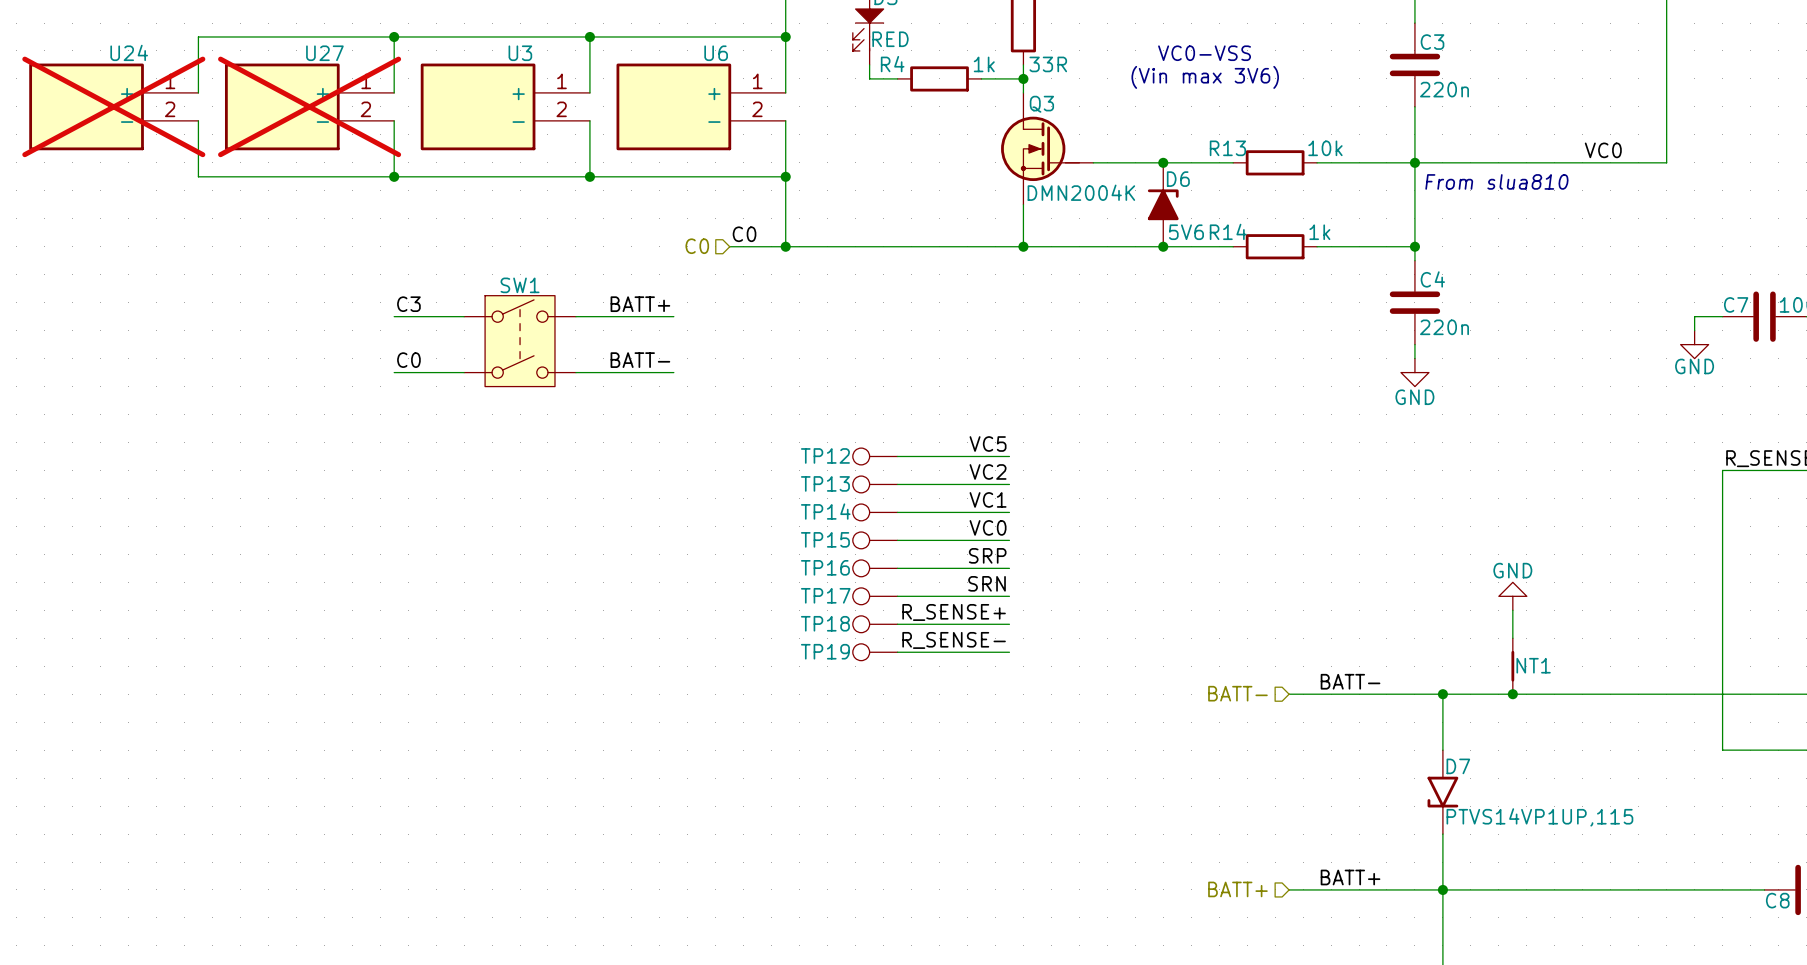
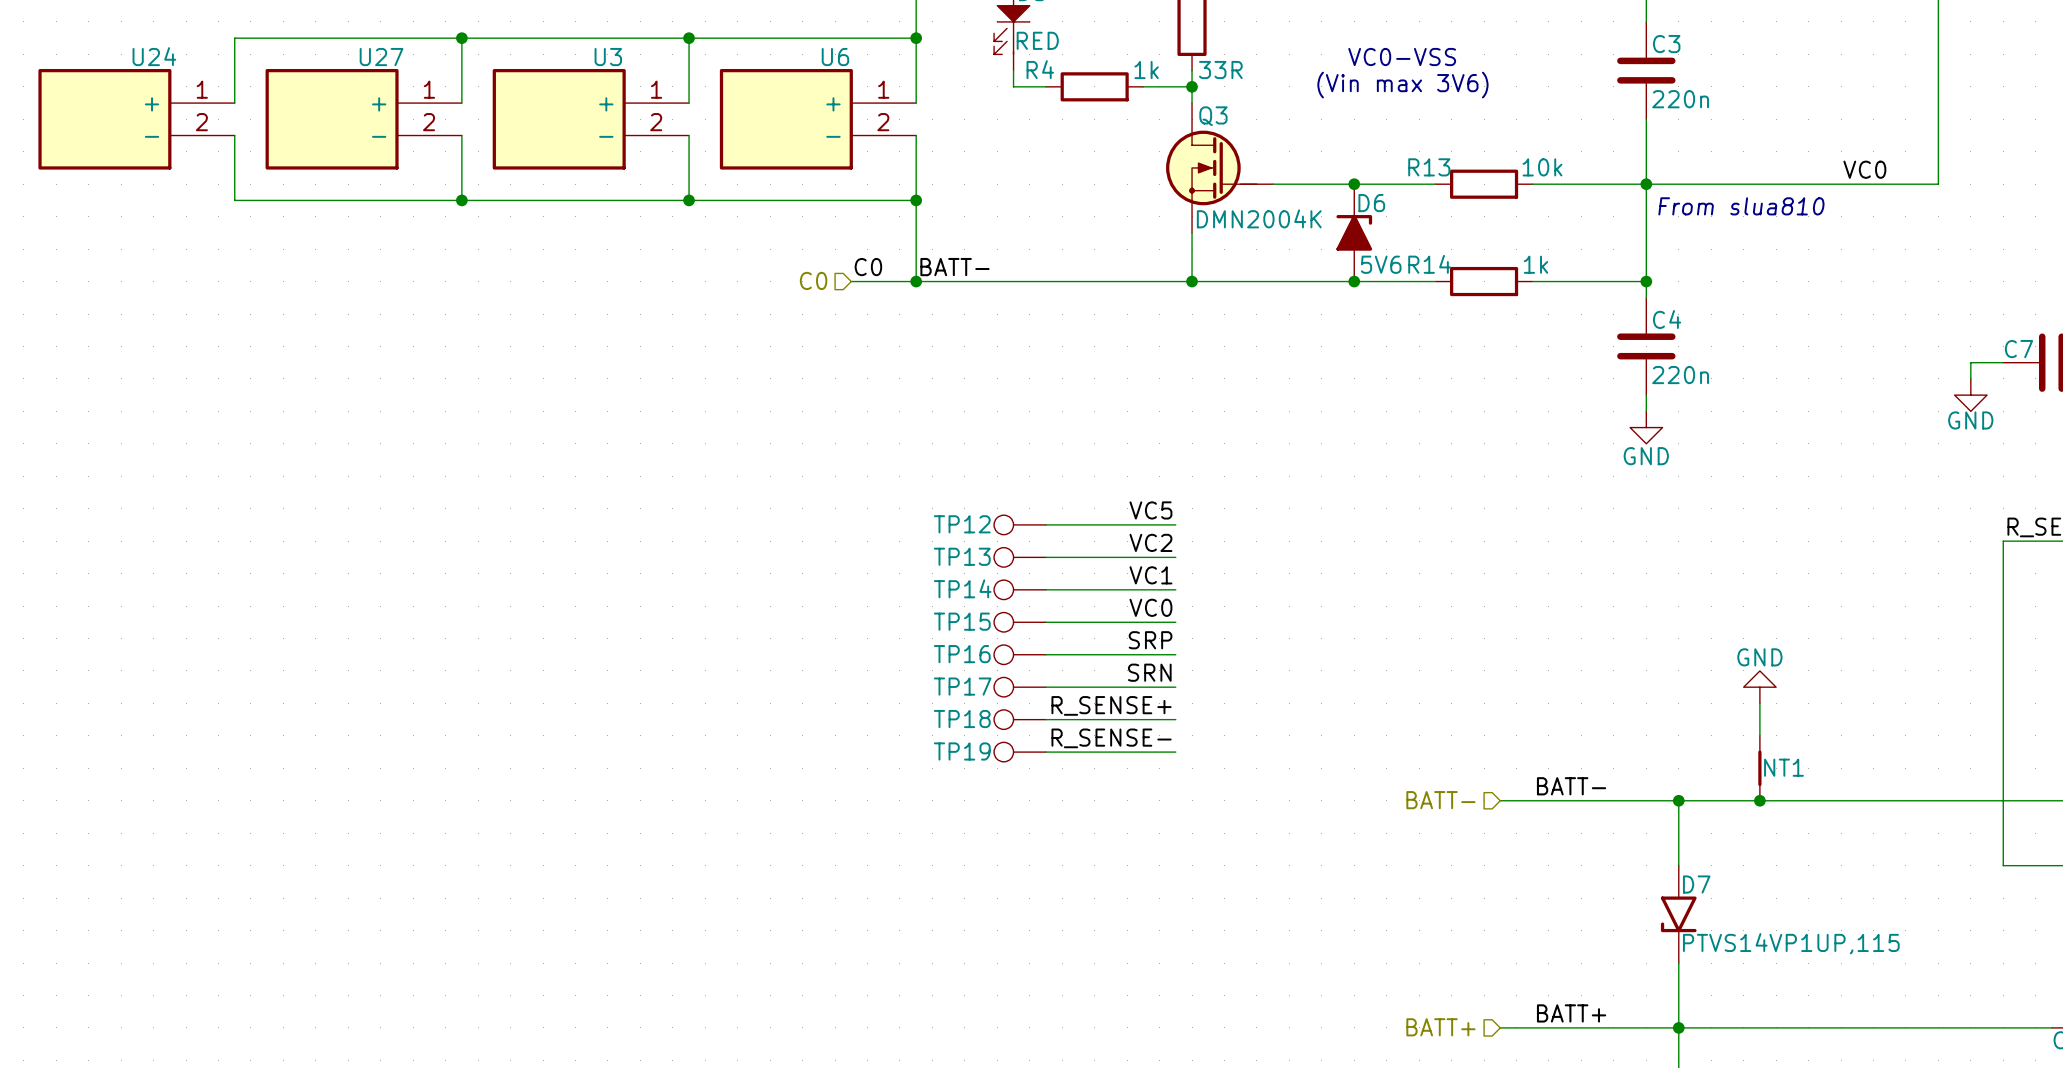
U24 do-not-place cross: (113, 106) -> none
U27 do-not-place cross: (309, 106) -> none
label: C3 (408, 304) -> none
label: BATT+ (640, 304) -> none
wire: (394, 316) (464, 316) -> none
wire: (575, 316) (673, 316) -> none
SW1: (520, 341) -> none
label: C0 (408, 360) -> none
label position: BATT- (640, 360) -> BATT- (954, 267)
wire: (394, 372) (464, 372) -> none
wire: (575, 372) (673, 372) -> none

